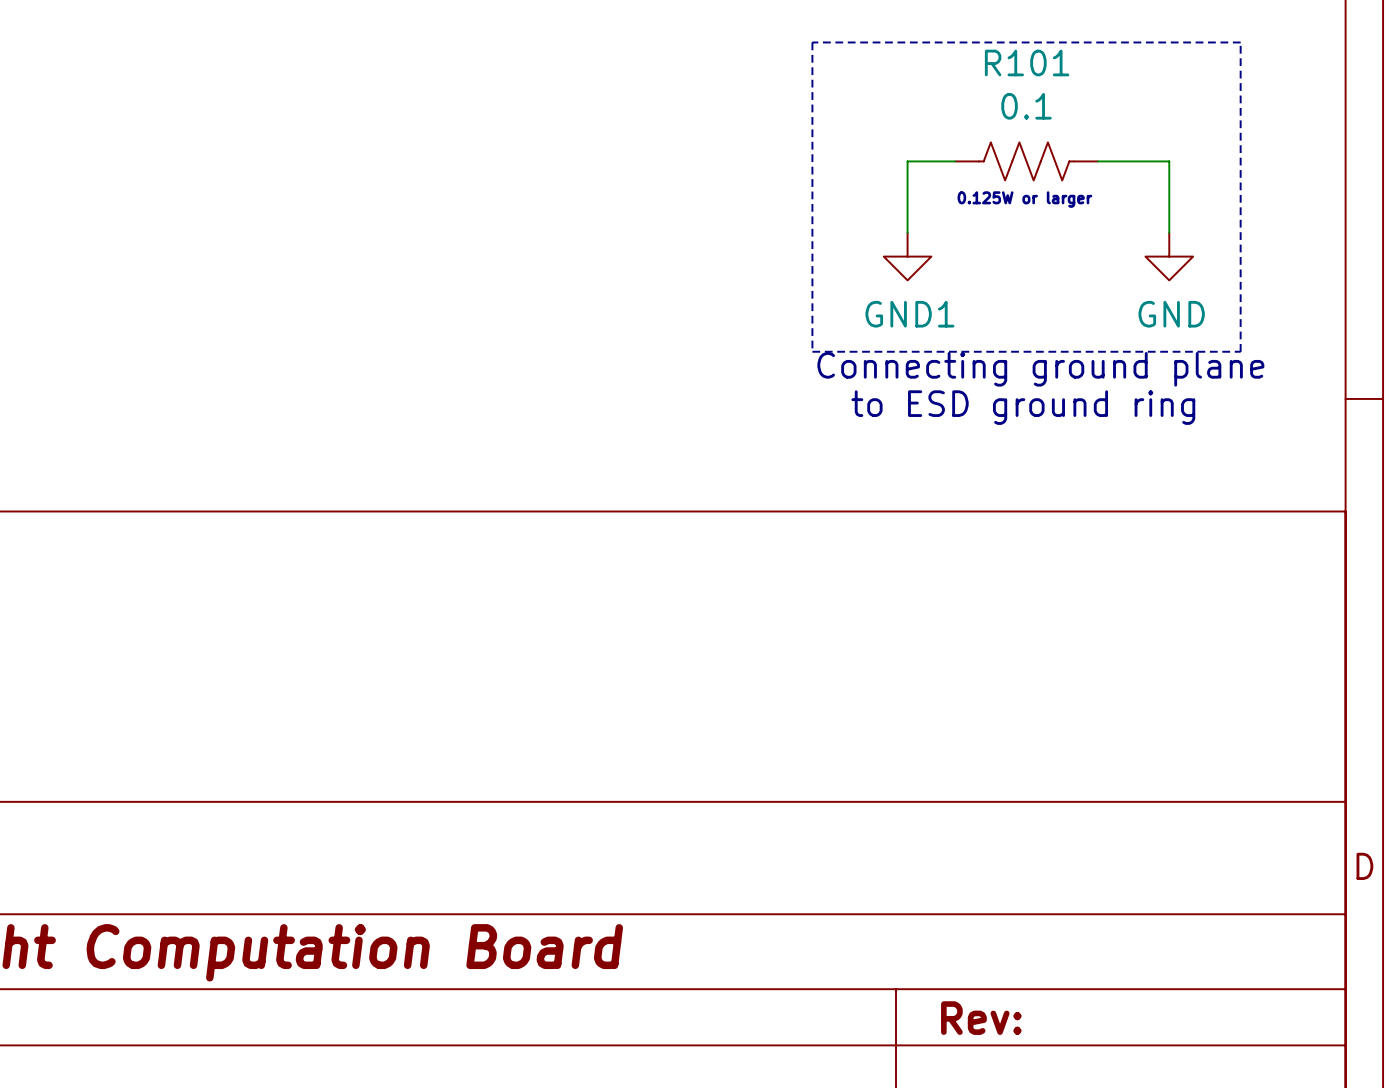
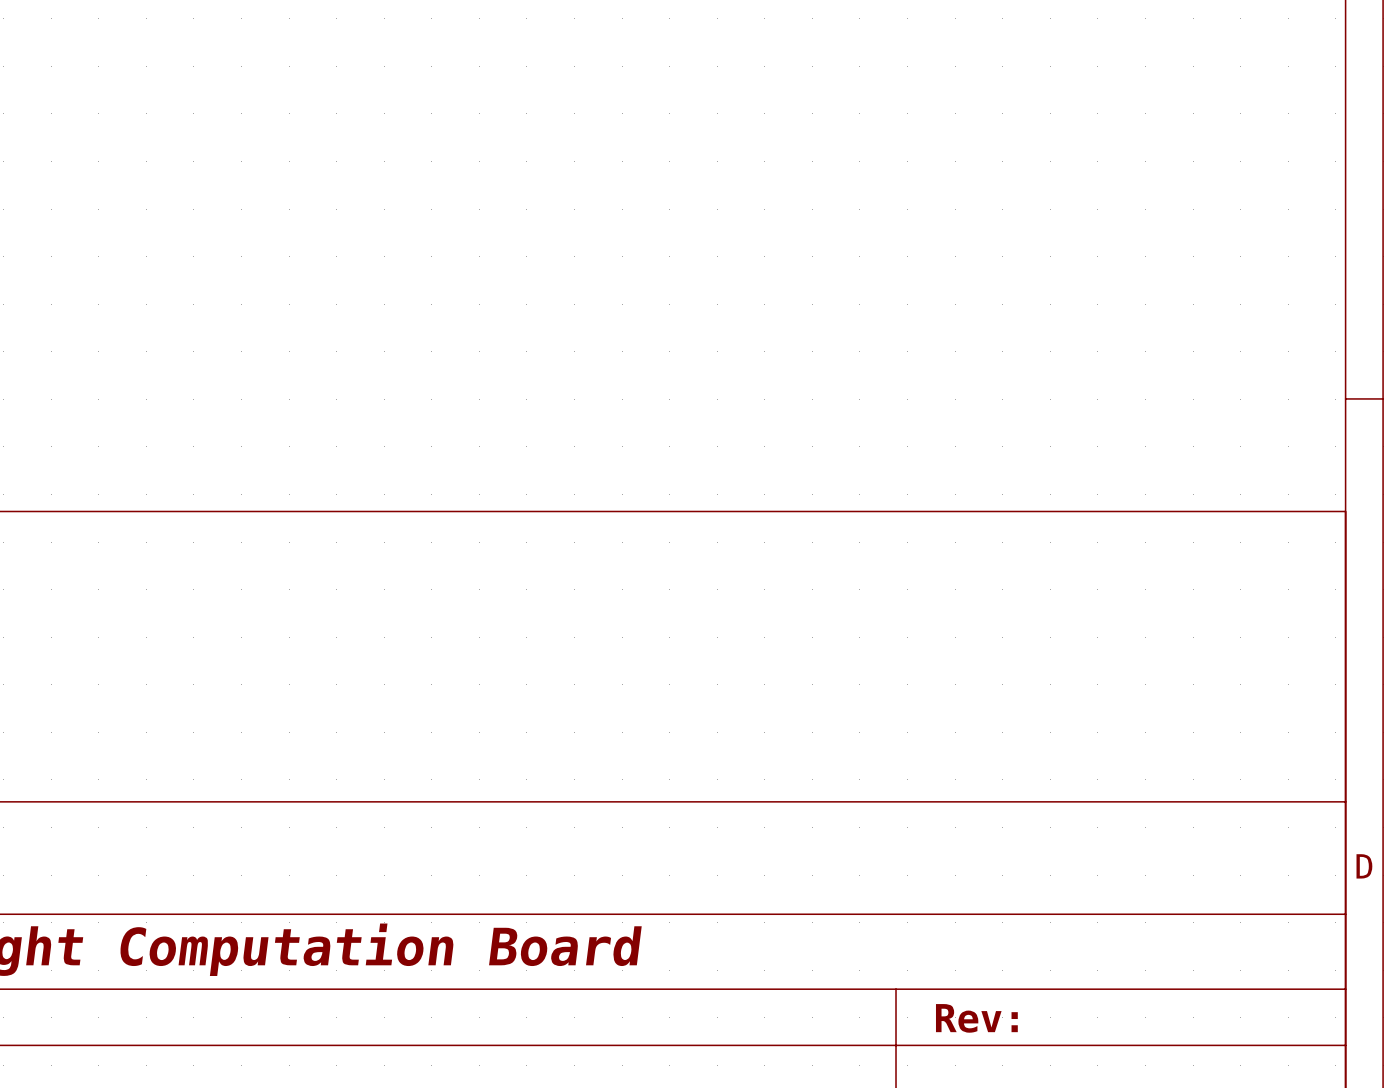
line: (812, 42) (812, 351) (1240, 351) (1240, 42) (812, 42) -> none
wire: (955, 161) (907, 161) (907, 232) -> none
R101: 0.1 (1026, 161) -> none
wire: (1097, 161) (1169, 161) (1169, 232) -> none
text: 0.125W or larger (1024, 199) -> none
power symbol: GND1 (907, 256) -> none
power symbol: GND (1169, 256) -> none
text: Connecting ground plane (1040, 369) -> none
text: to ESD ground ring (1023, 407) -> none

